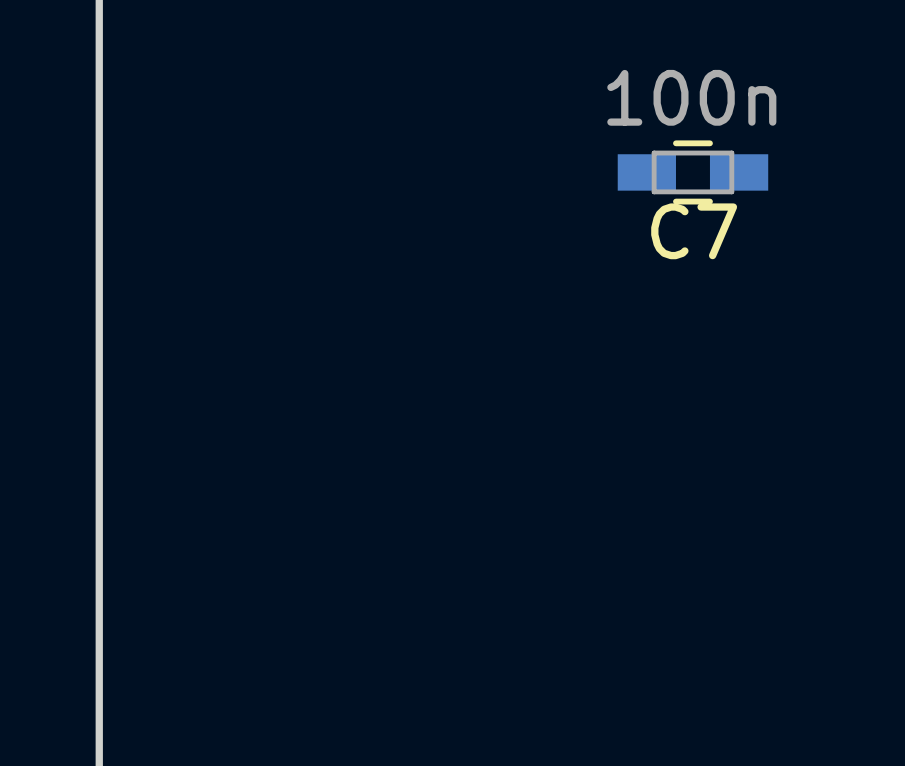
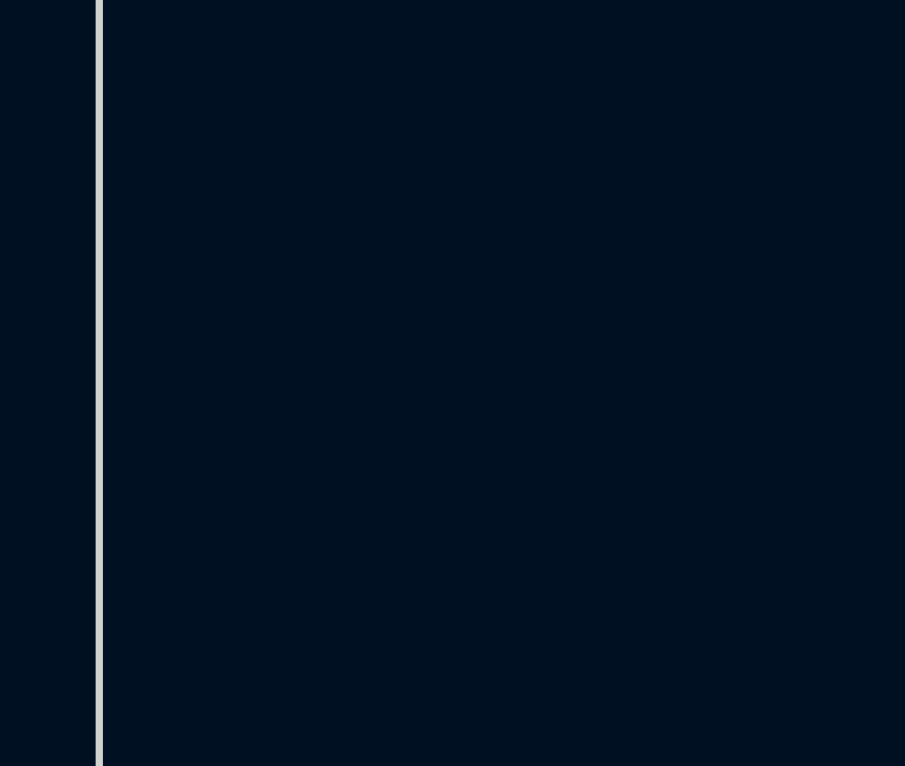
C7: 100n (692, 172) -> none

